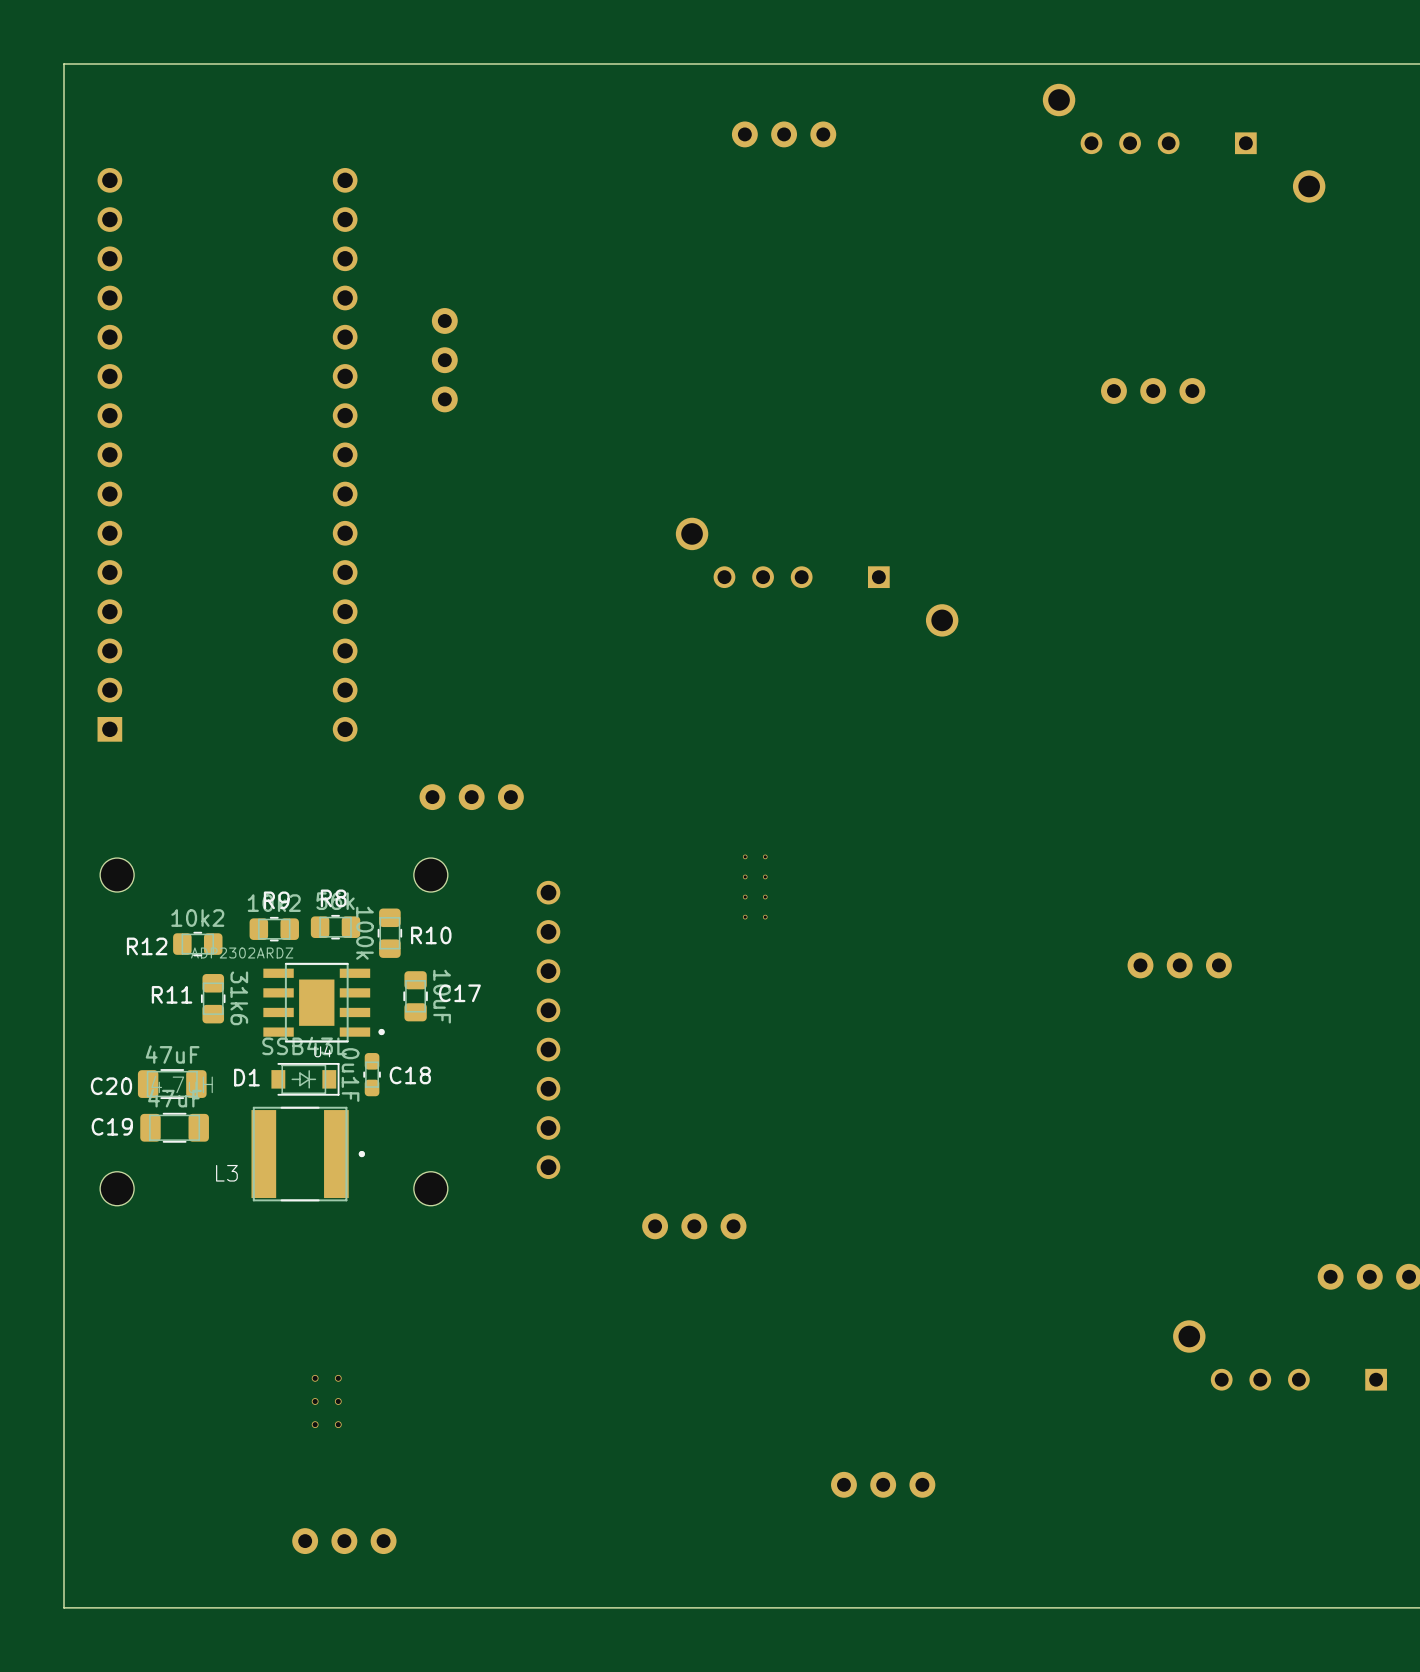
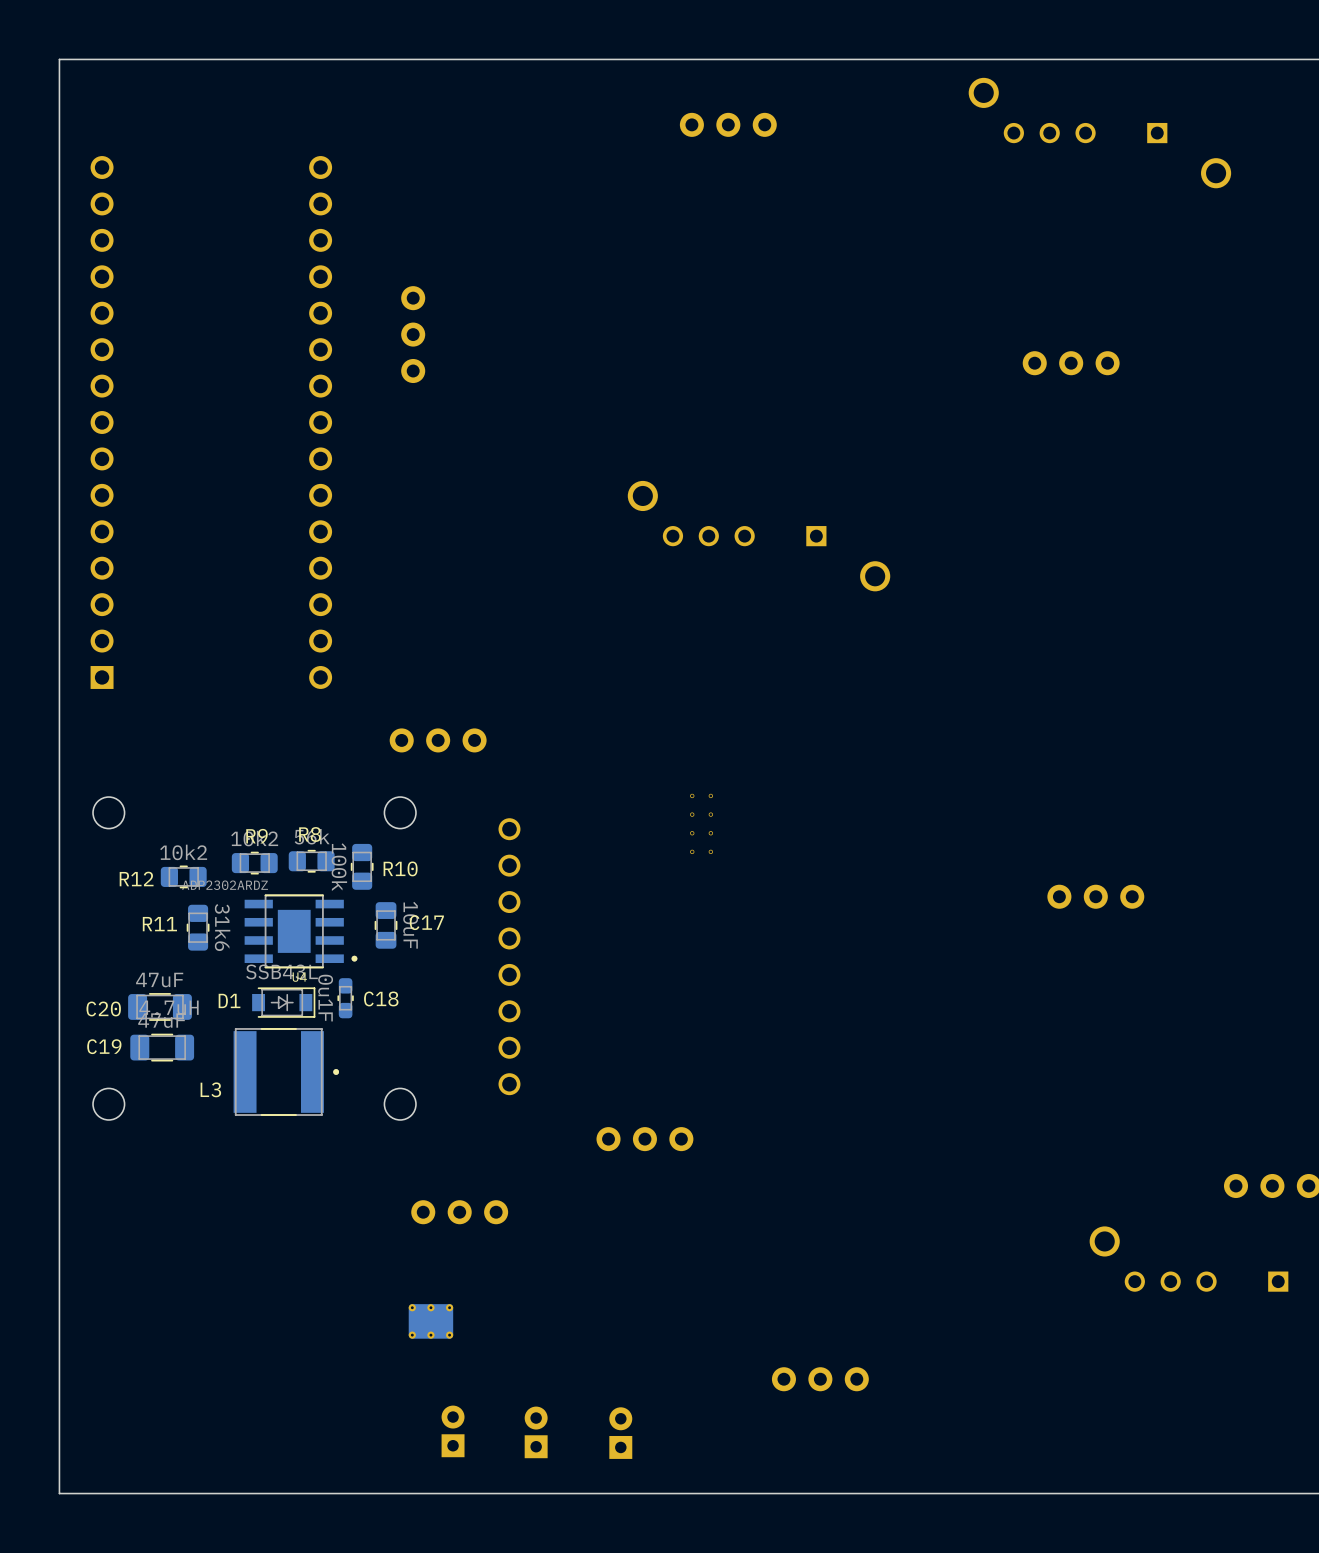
part: (326, 1401) -> none
part: none -> (430, 1321)
part: none -> (453, 1431)
part position: (344, 1541) -> (459, 1212)
part: none -> (536, 1432)
part: none -> (620, 1433)

